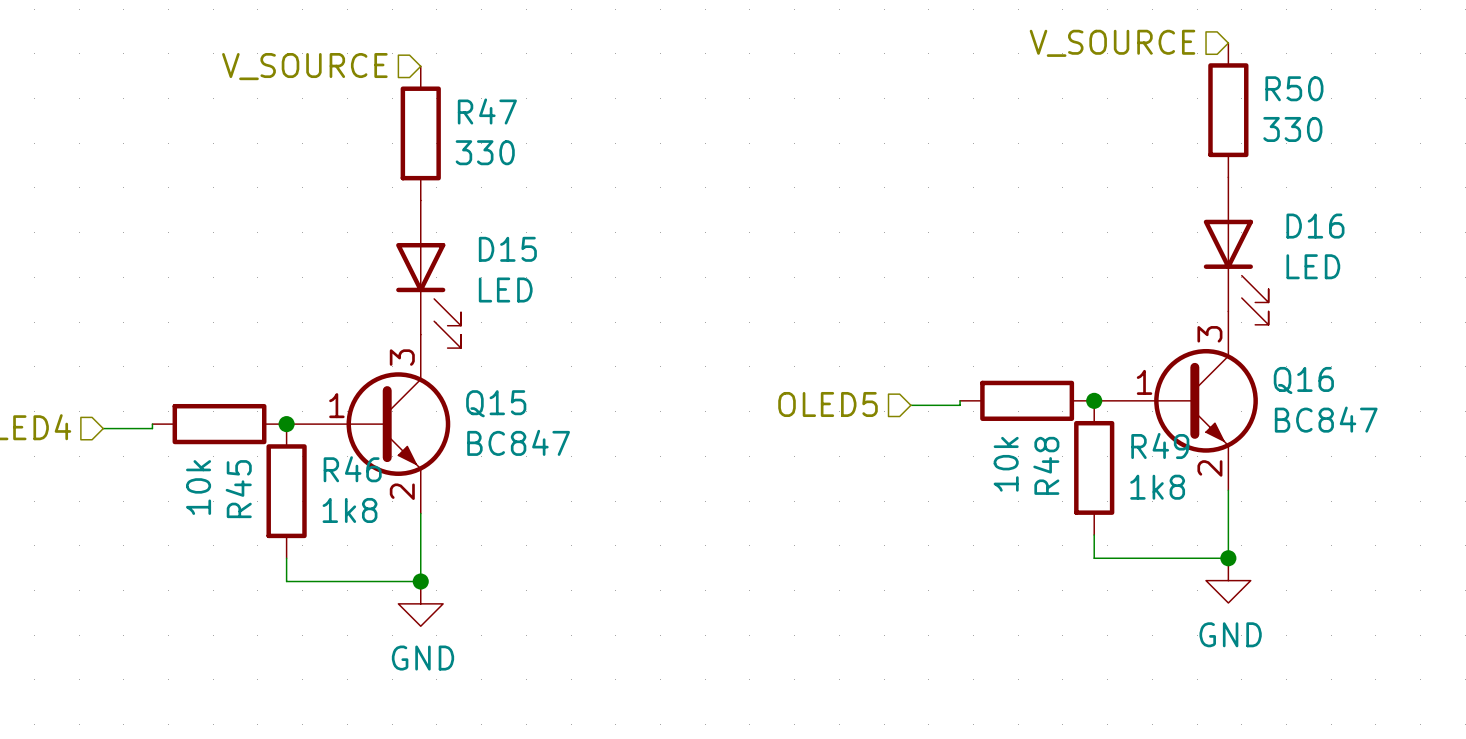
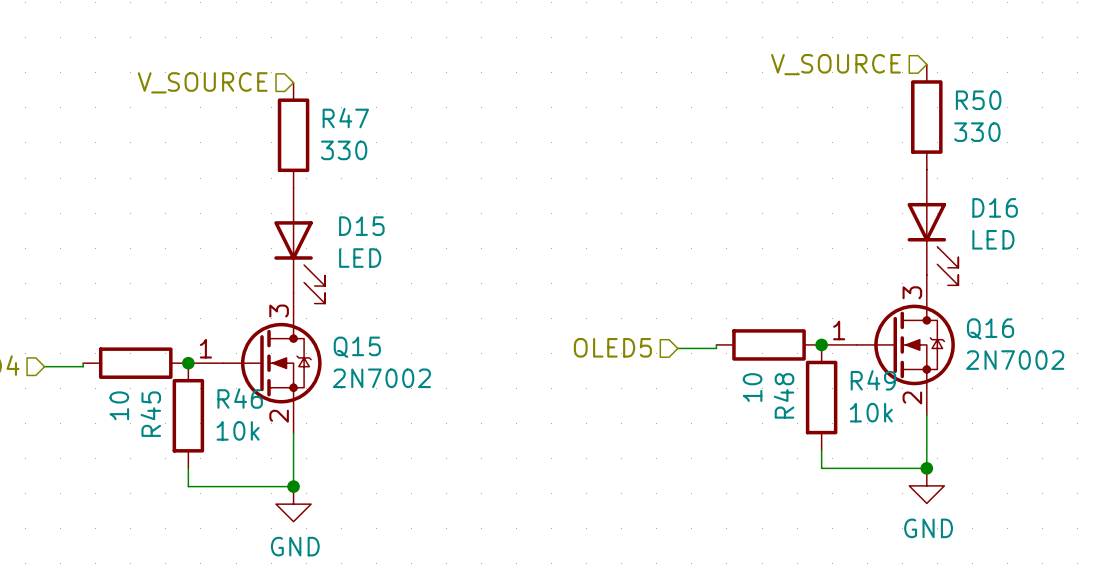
Q16 symbol: [1094, 311, 1258, 491] -> [821, 274, 955, 416]
Q15 symbol: [286, 334, 451, 514] -> [188, 293, 322, 434]
Q16 value: BC847 (1326, 419) -> 2N7002 (1015, 360)
Q15 value: BC847 (518, 442) -> 2N7002 (381, 378)
R48 value: 10k (1006, 464) -> 10 (752, 387)
R45 value: 10k (198, 487) -> 10 (119, 405)
R49 value: 1k8 (1157, 487) -> 10k (871, 412)
R46 value: 1k8 (350, 510) -> 10k (238, 430)

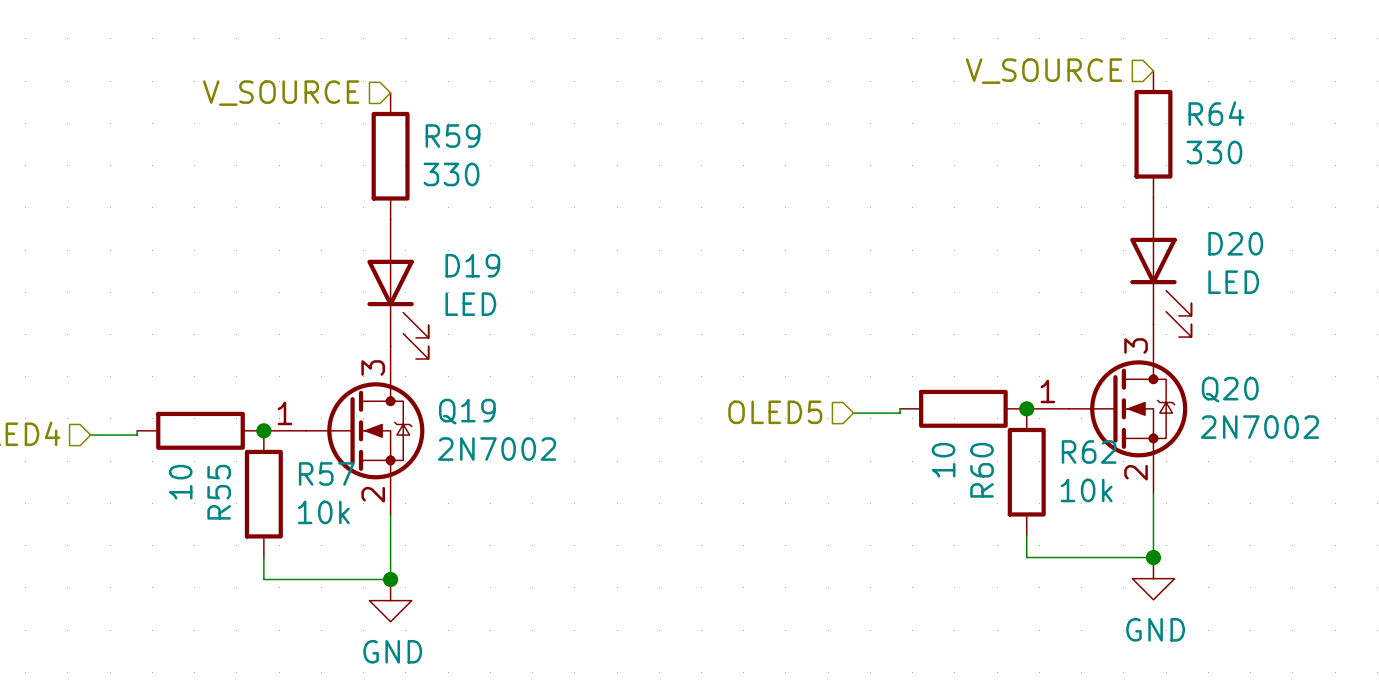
R50 name: R50 (978, 100) -> R64 (1216, 113)
R47 name: R47 (345, 118) -> R59 (453, 136)
D16 name: D16 (995, 207) -> D20 (1235, 243)
D15 name: D15 (361, 226) -> D19 (472, 265)
Q16 name: Q16 (990, 328) -> Q20 (1230, 389)
Q15 name: Q15 (357, 347) -> Q19 (467, 411)
R49 name: R49 (873, 380) -> R62 (1089, 451)
R48 name: R48 (784, 395) -> R60 (982, 470)
R46 name: R46 (240, 398) -> R57 (326, 473)
R45 name: R45 (150, 414) -> R55 (219, 492)

